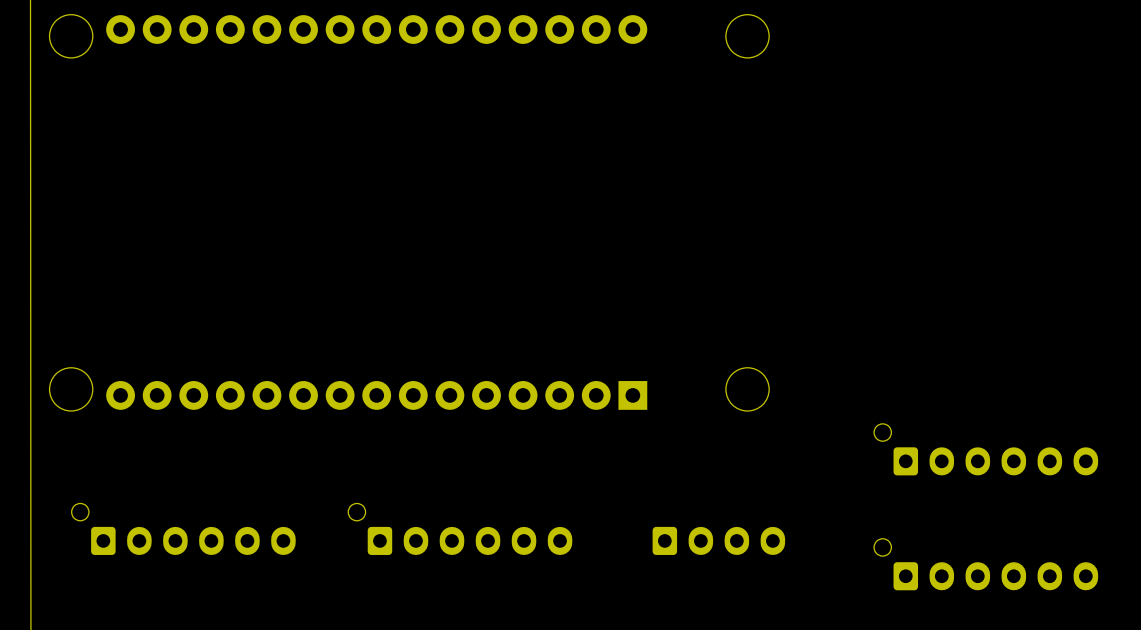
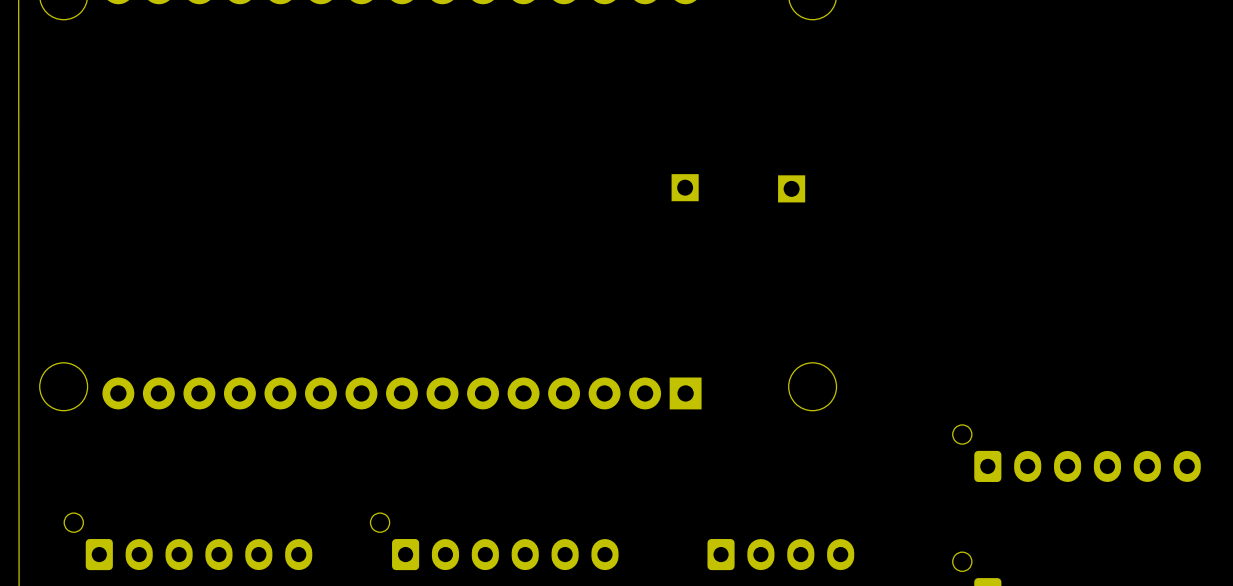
part: none -> (685, 187)
part: none -> (791, 188)

